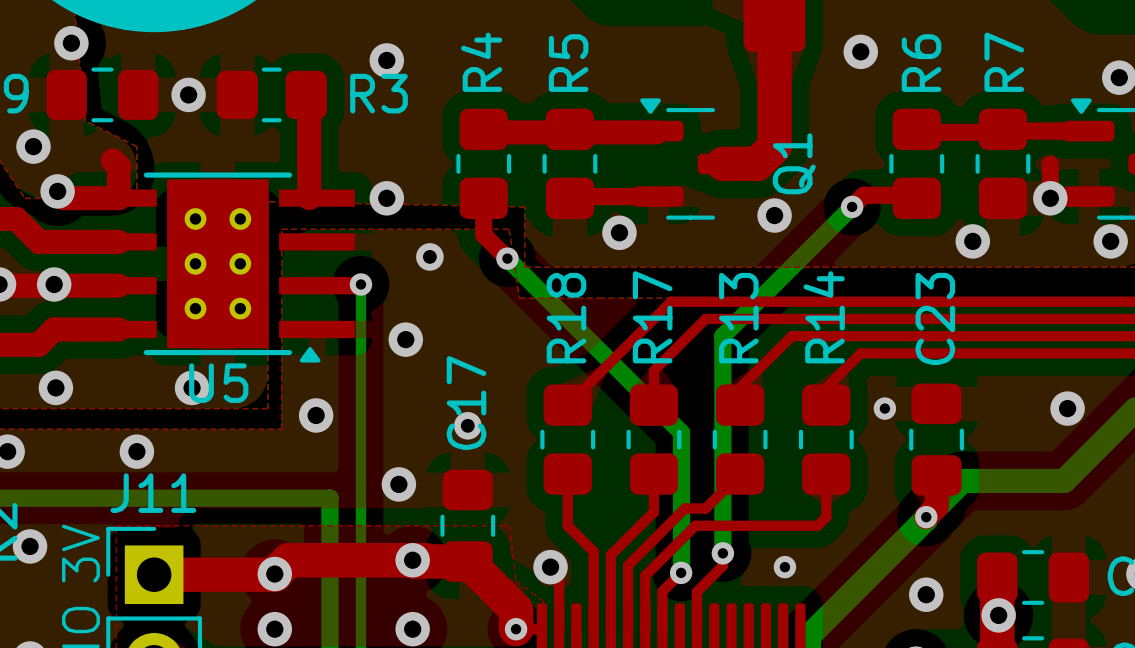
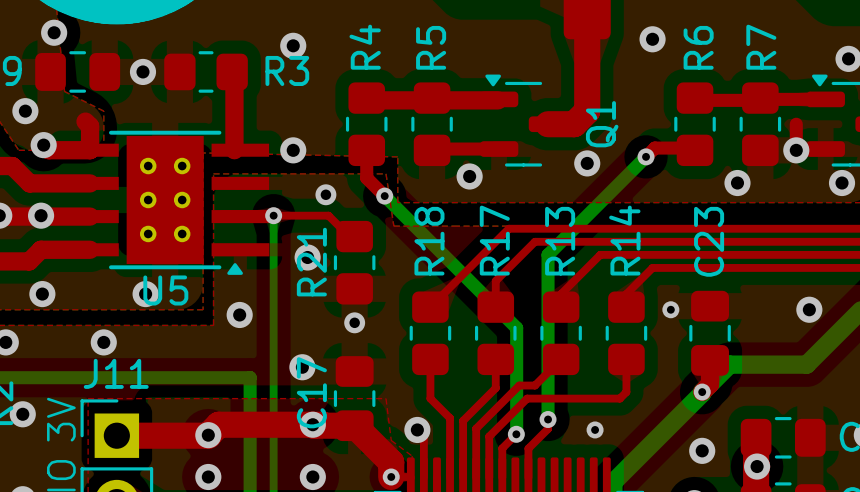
top track: none -> (273, 215) (328, 215) (349, 236)
R21: none -> (354, 262)
C17 name position: C17 (466, 403) -> C17 (311, 392)

